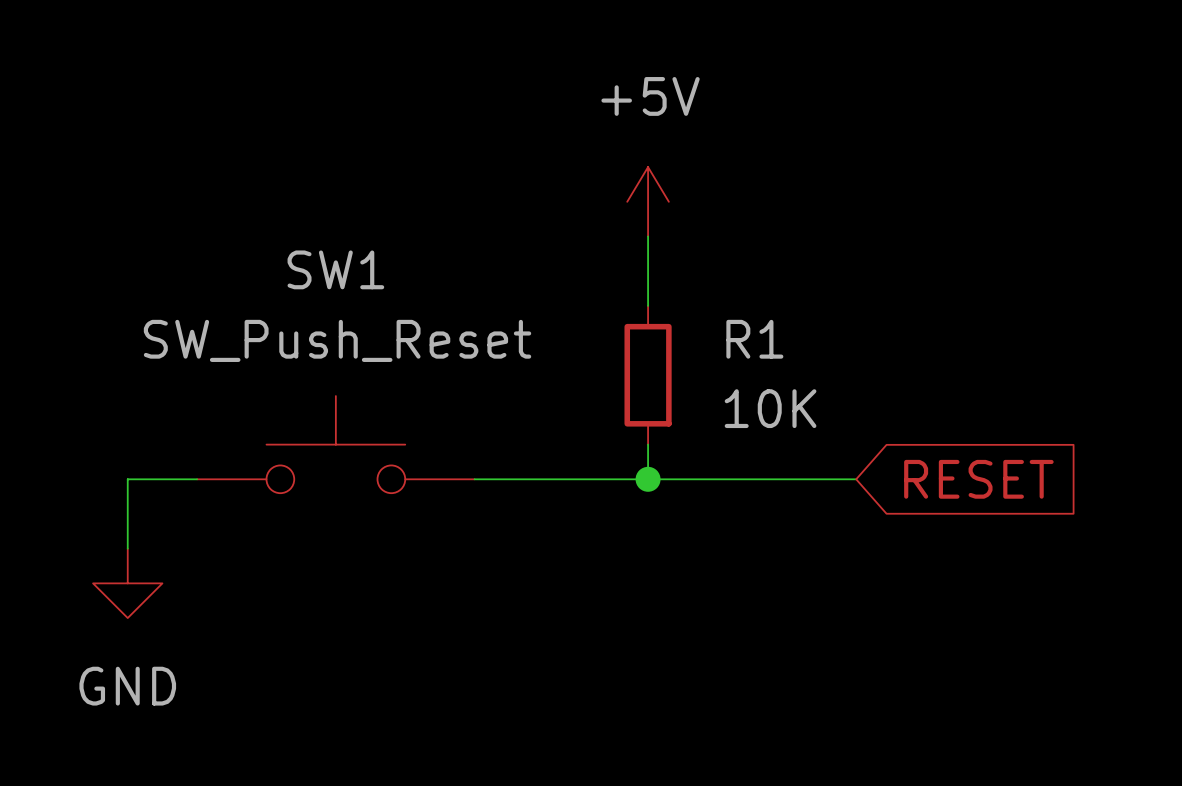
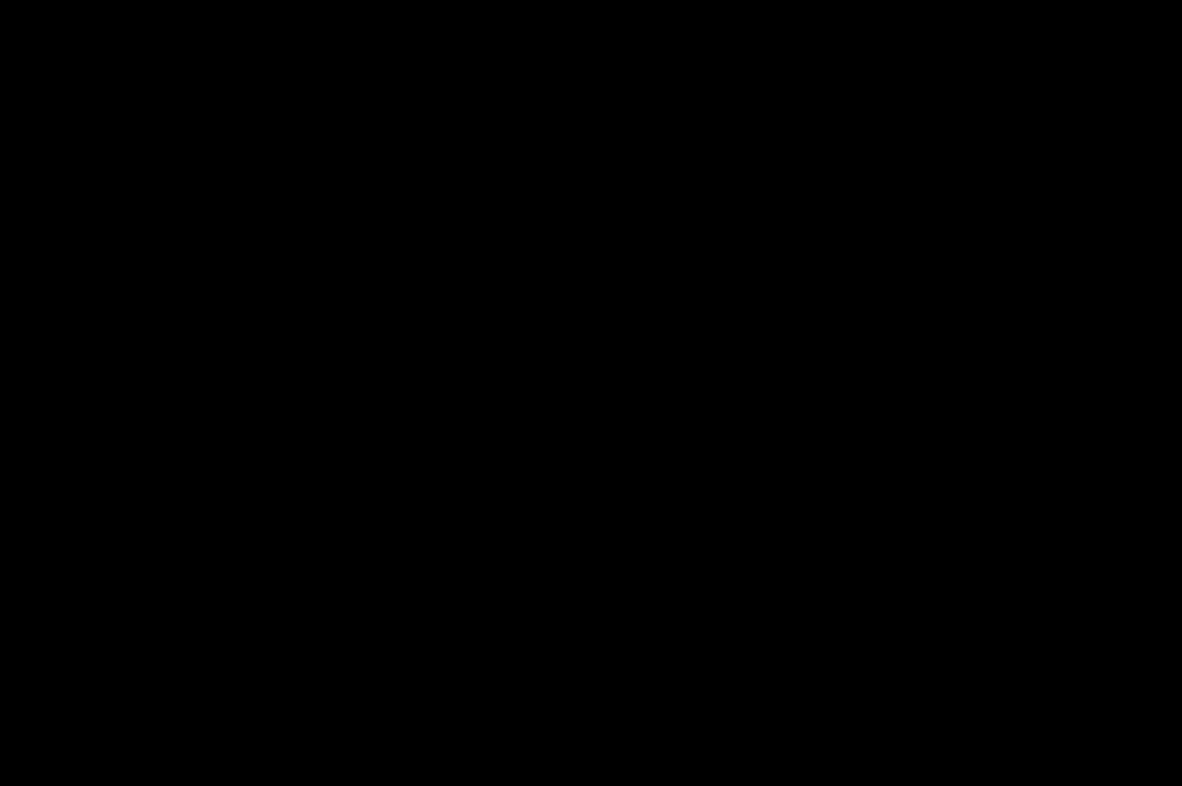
power symbol: +5V (648, 201) -> none
wire: (648, 236) (648, 305) -> none
R1: 10K (648, 375) -> none
SW1: SW_Push_Reset (335, 444) -> none
wire: (648, 444) (648, 479) -> none
wire: (197, 479) (127, 479) (127, 548) -> none
wire: (474, 479) (856, 479) -> none
junction: (648, 479) -> none
global label: RESET (978, 479) -> none
power symbol: GND (127, 583) -> none

